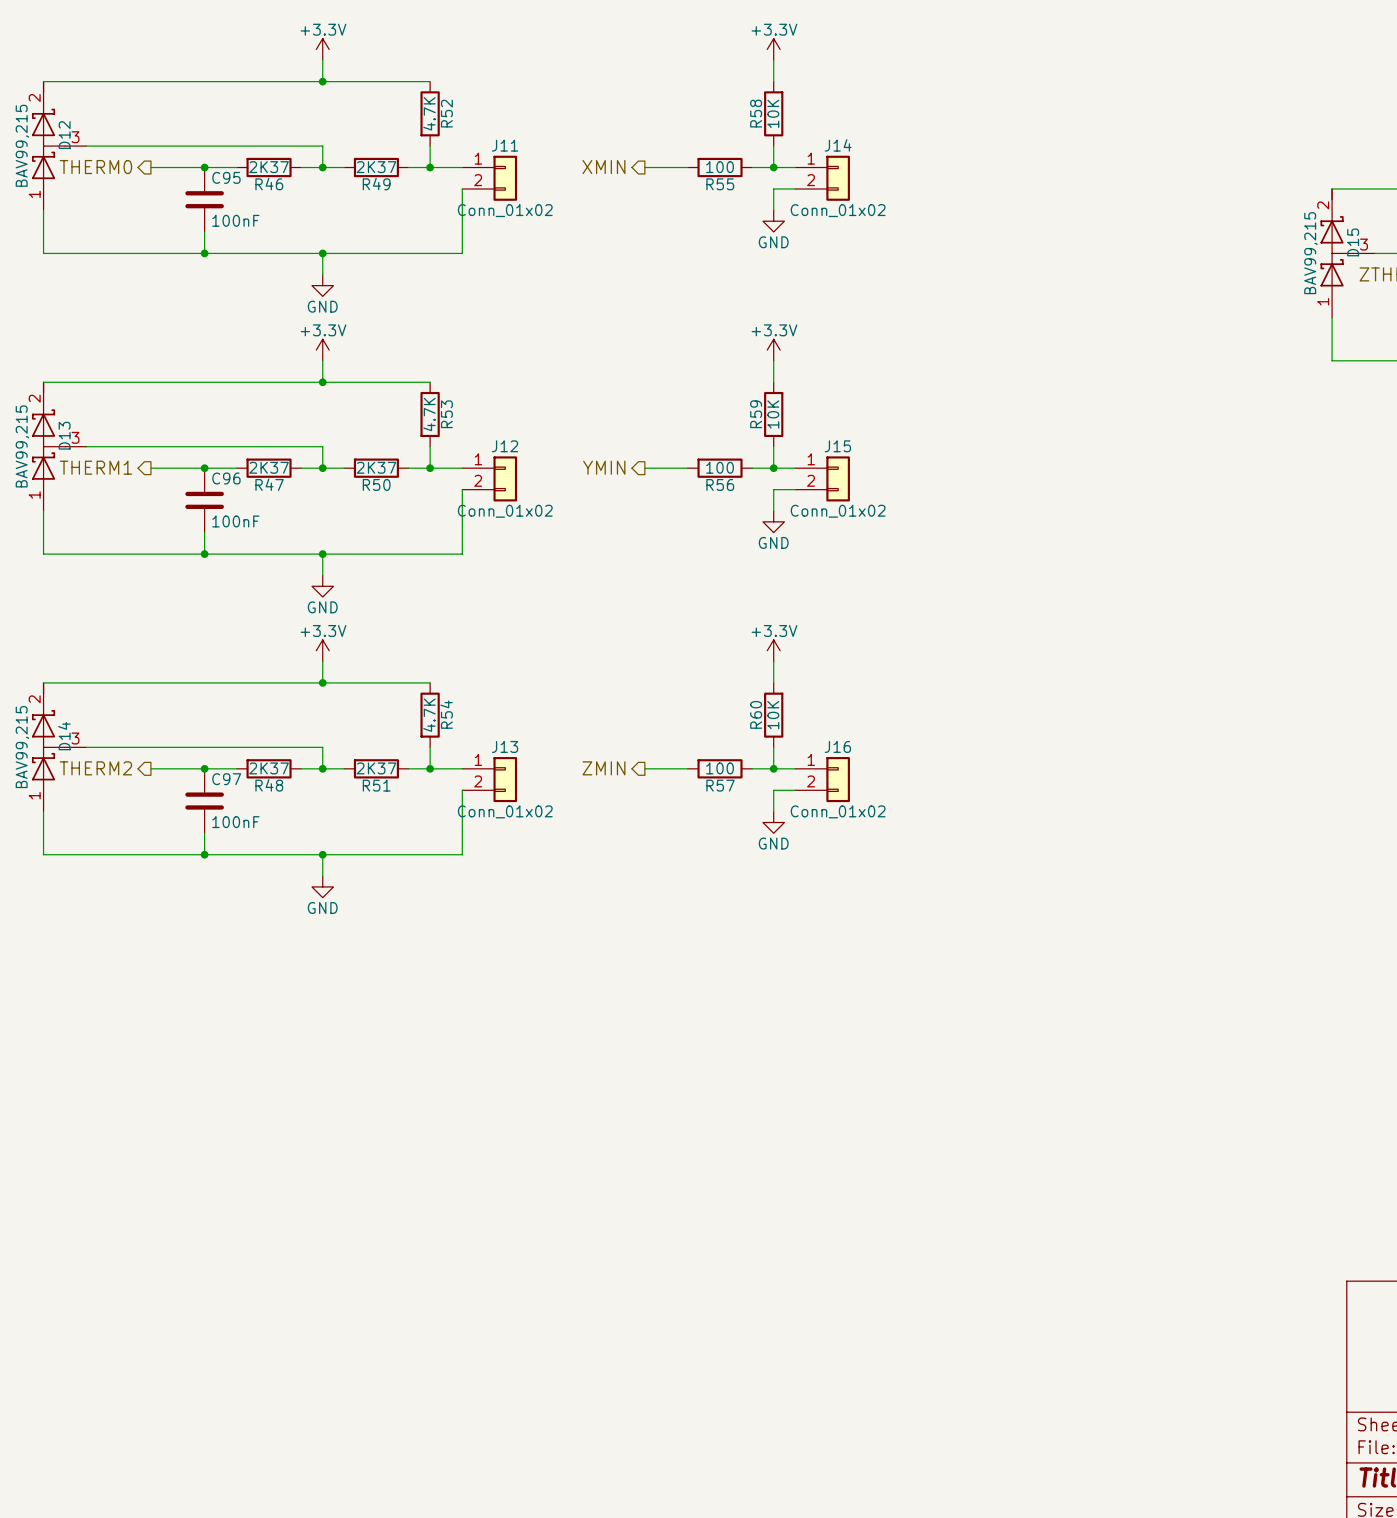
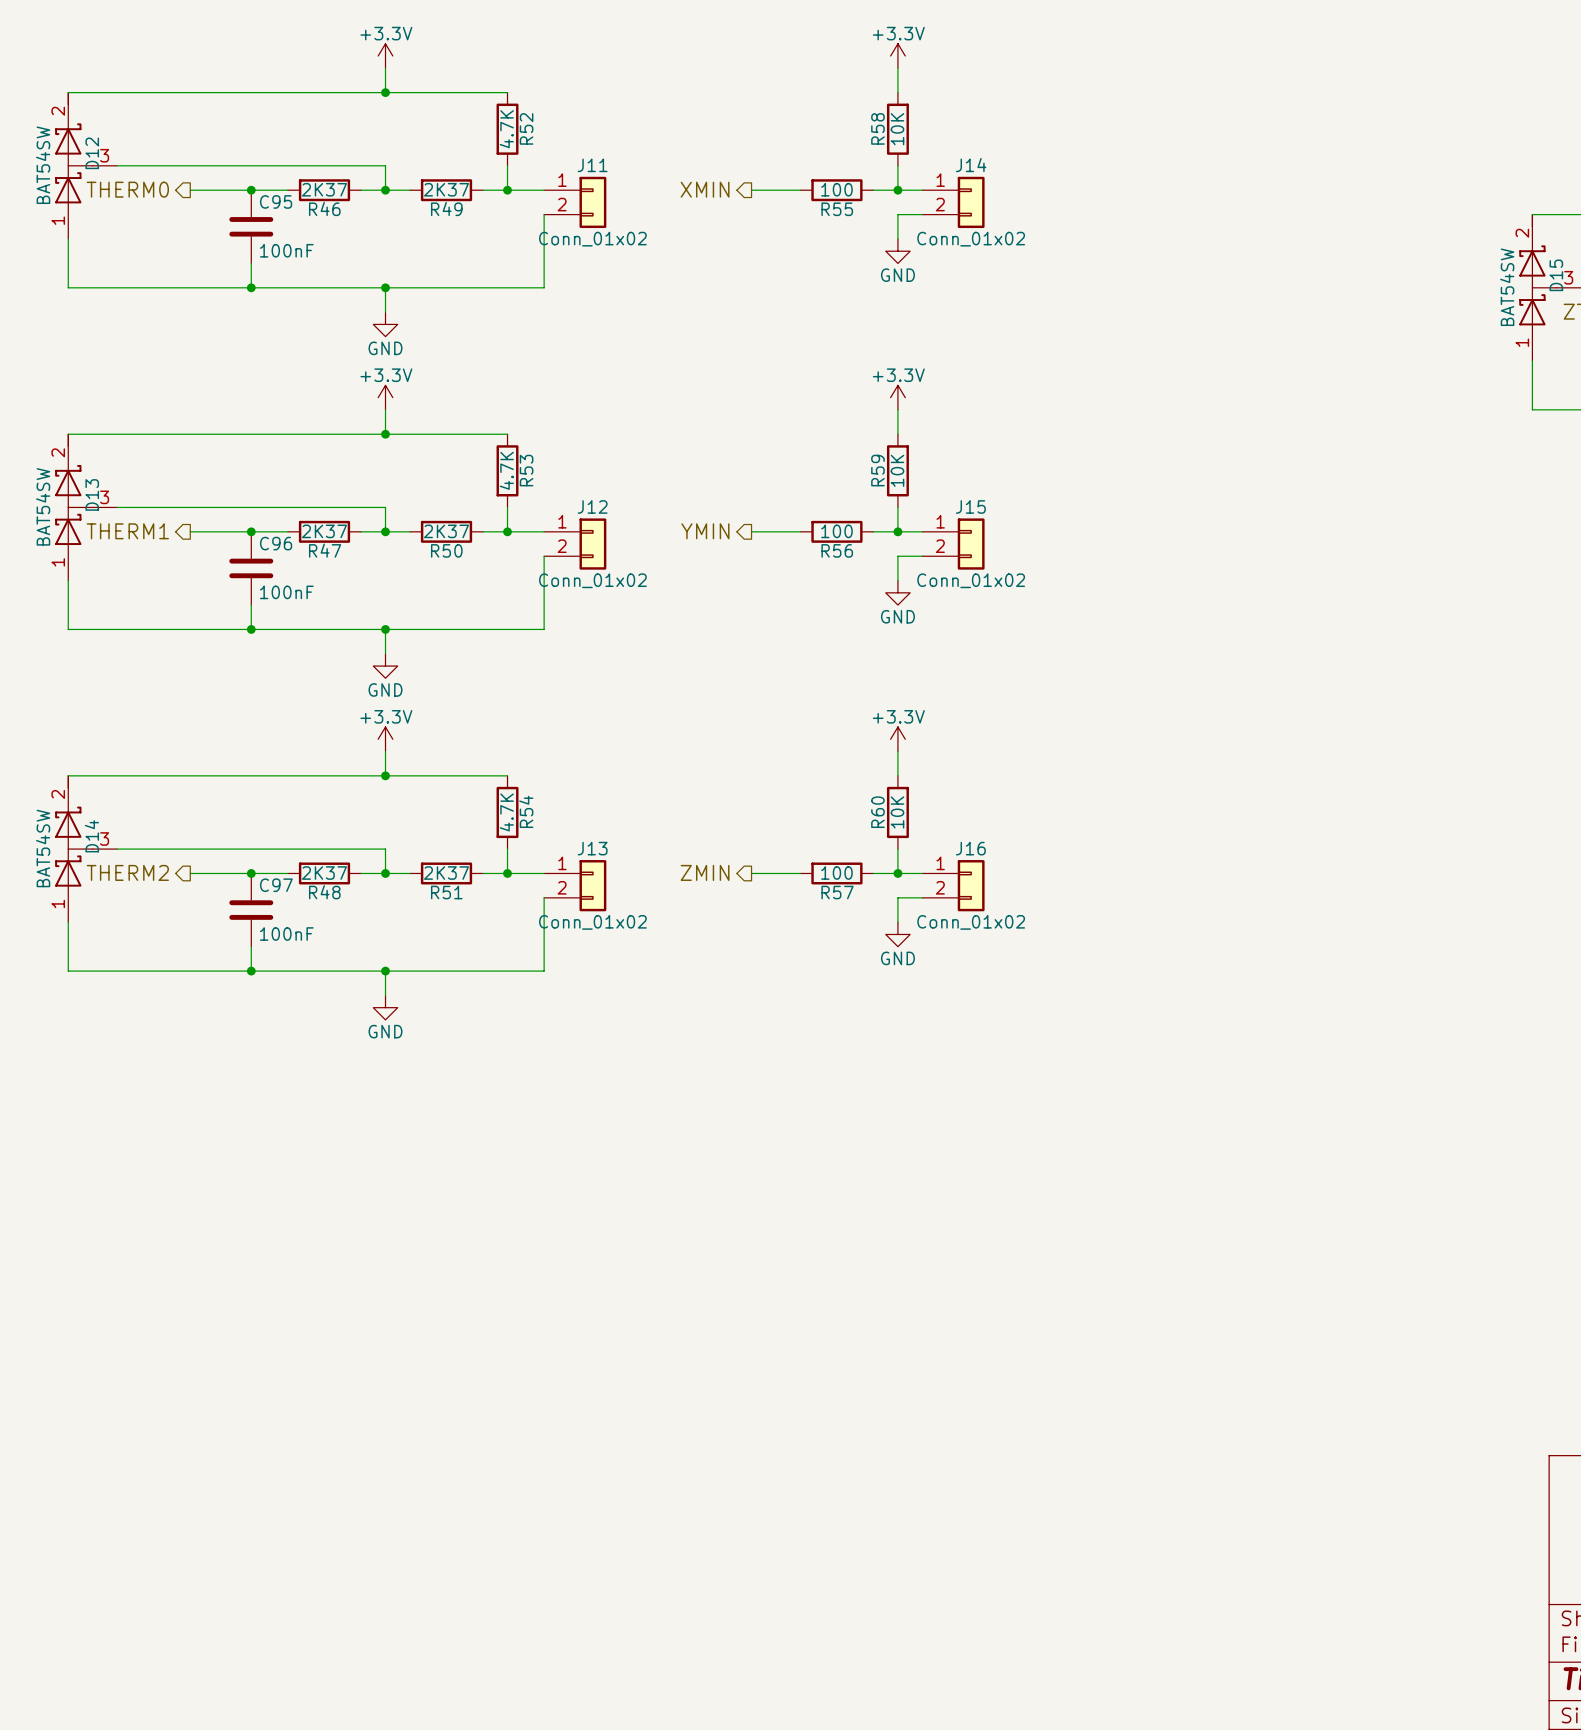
D12 value: BAV99,215 (22, 145) -> BAT54SW (43, 165)
D15 value: BAV99,215 (1310, 253) -> BAT54SW (1507, 287)
D13 value: BAV99,215 (22, 446) -> BAT54SW (43, 506)
D14 value: BAV99,215 (22, 747) -> BAT54SW (43, 848)

